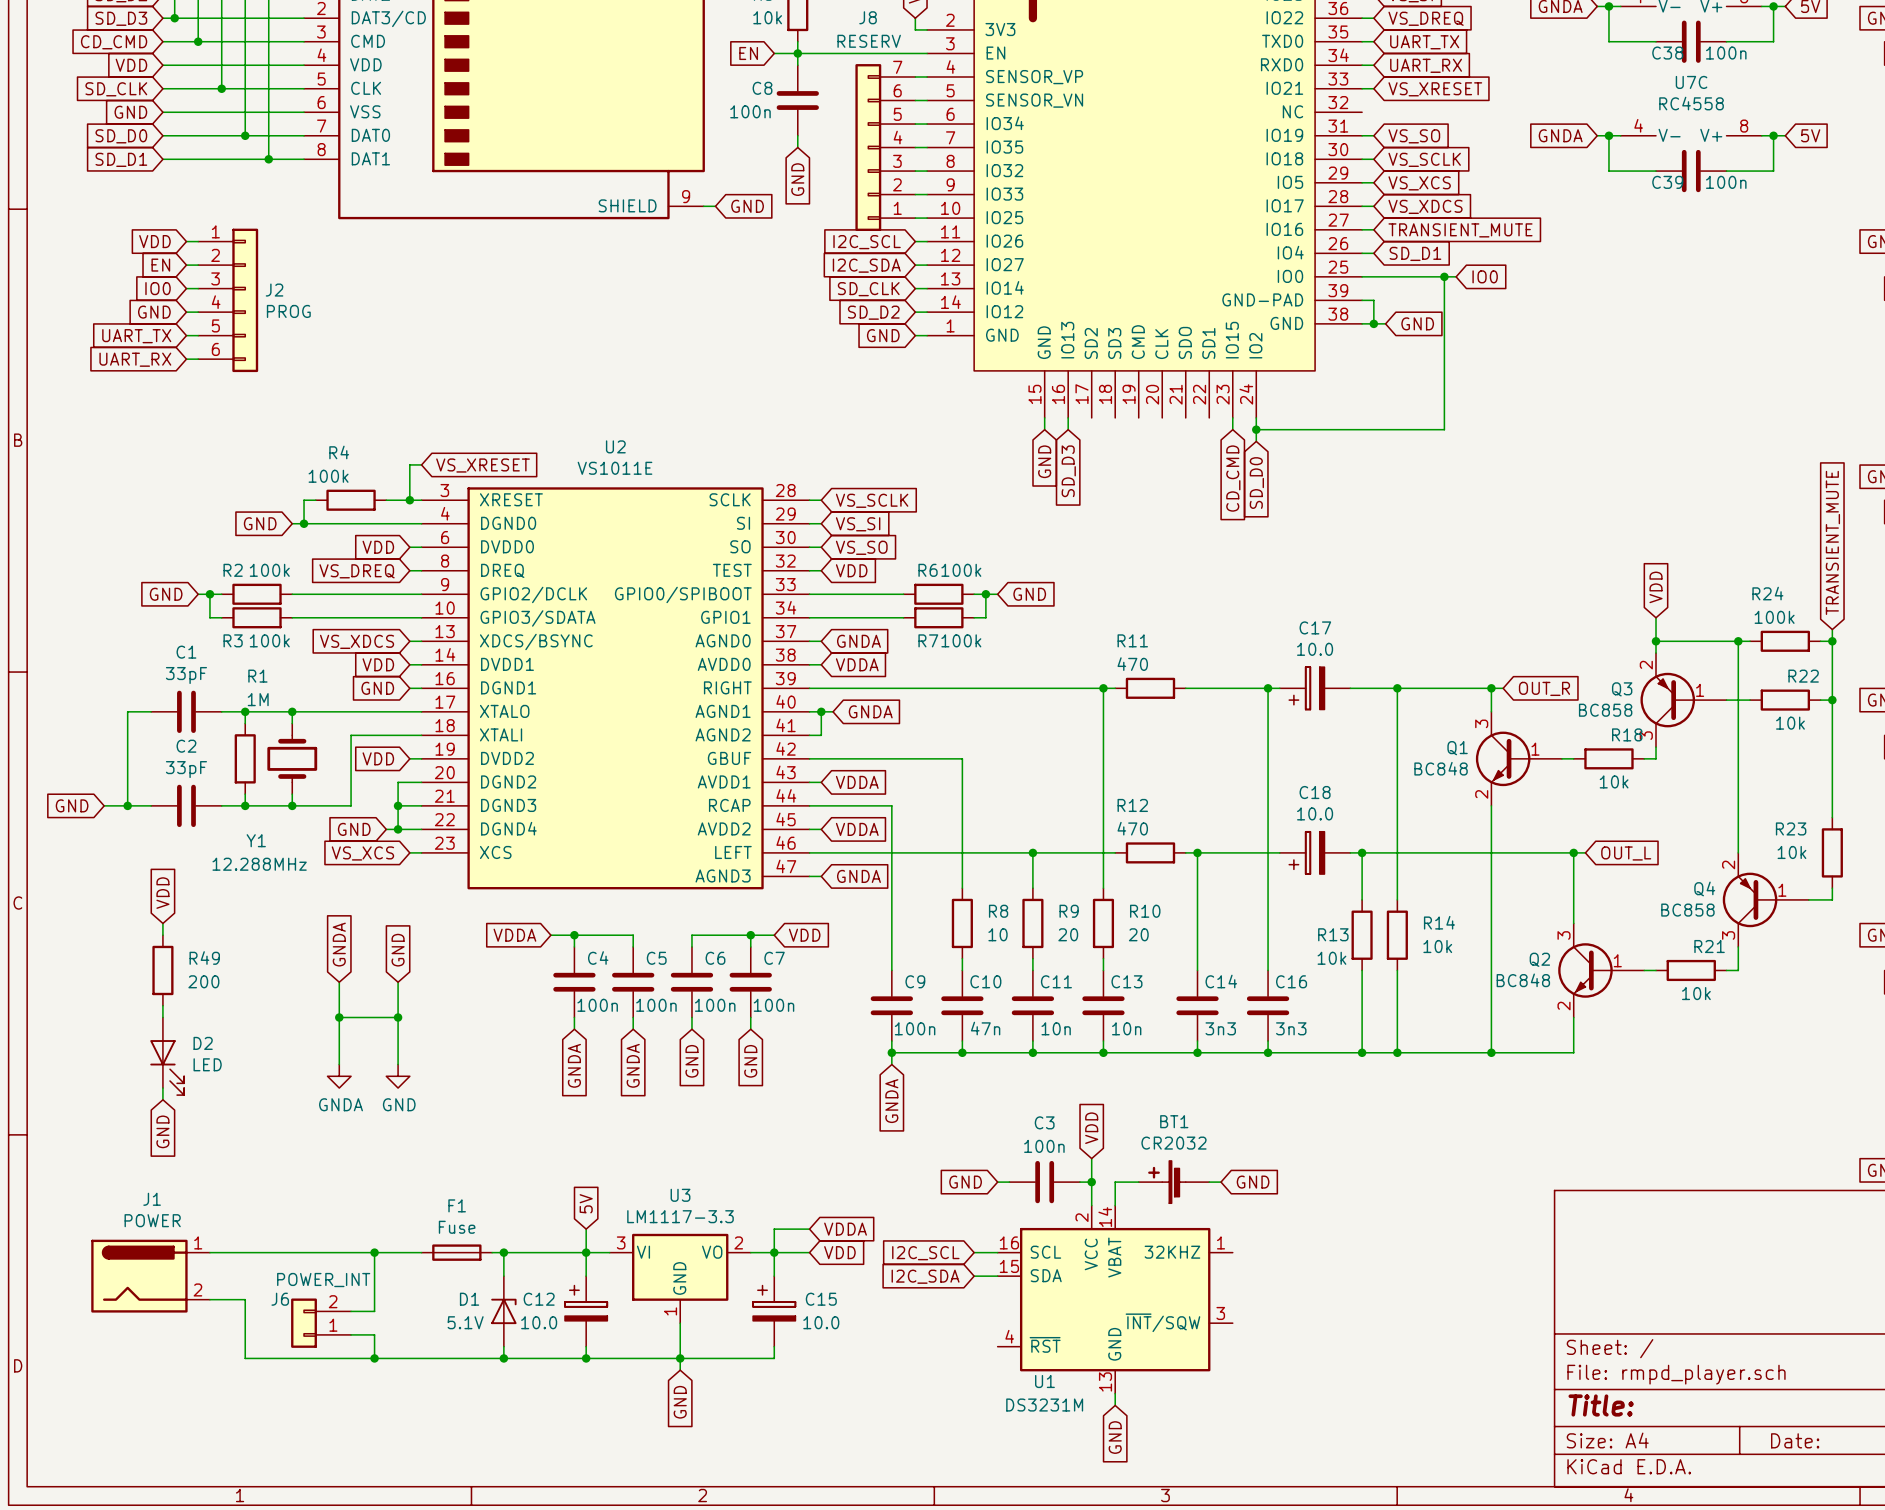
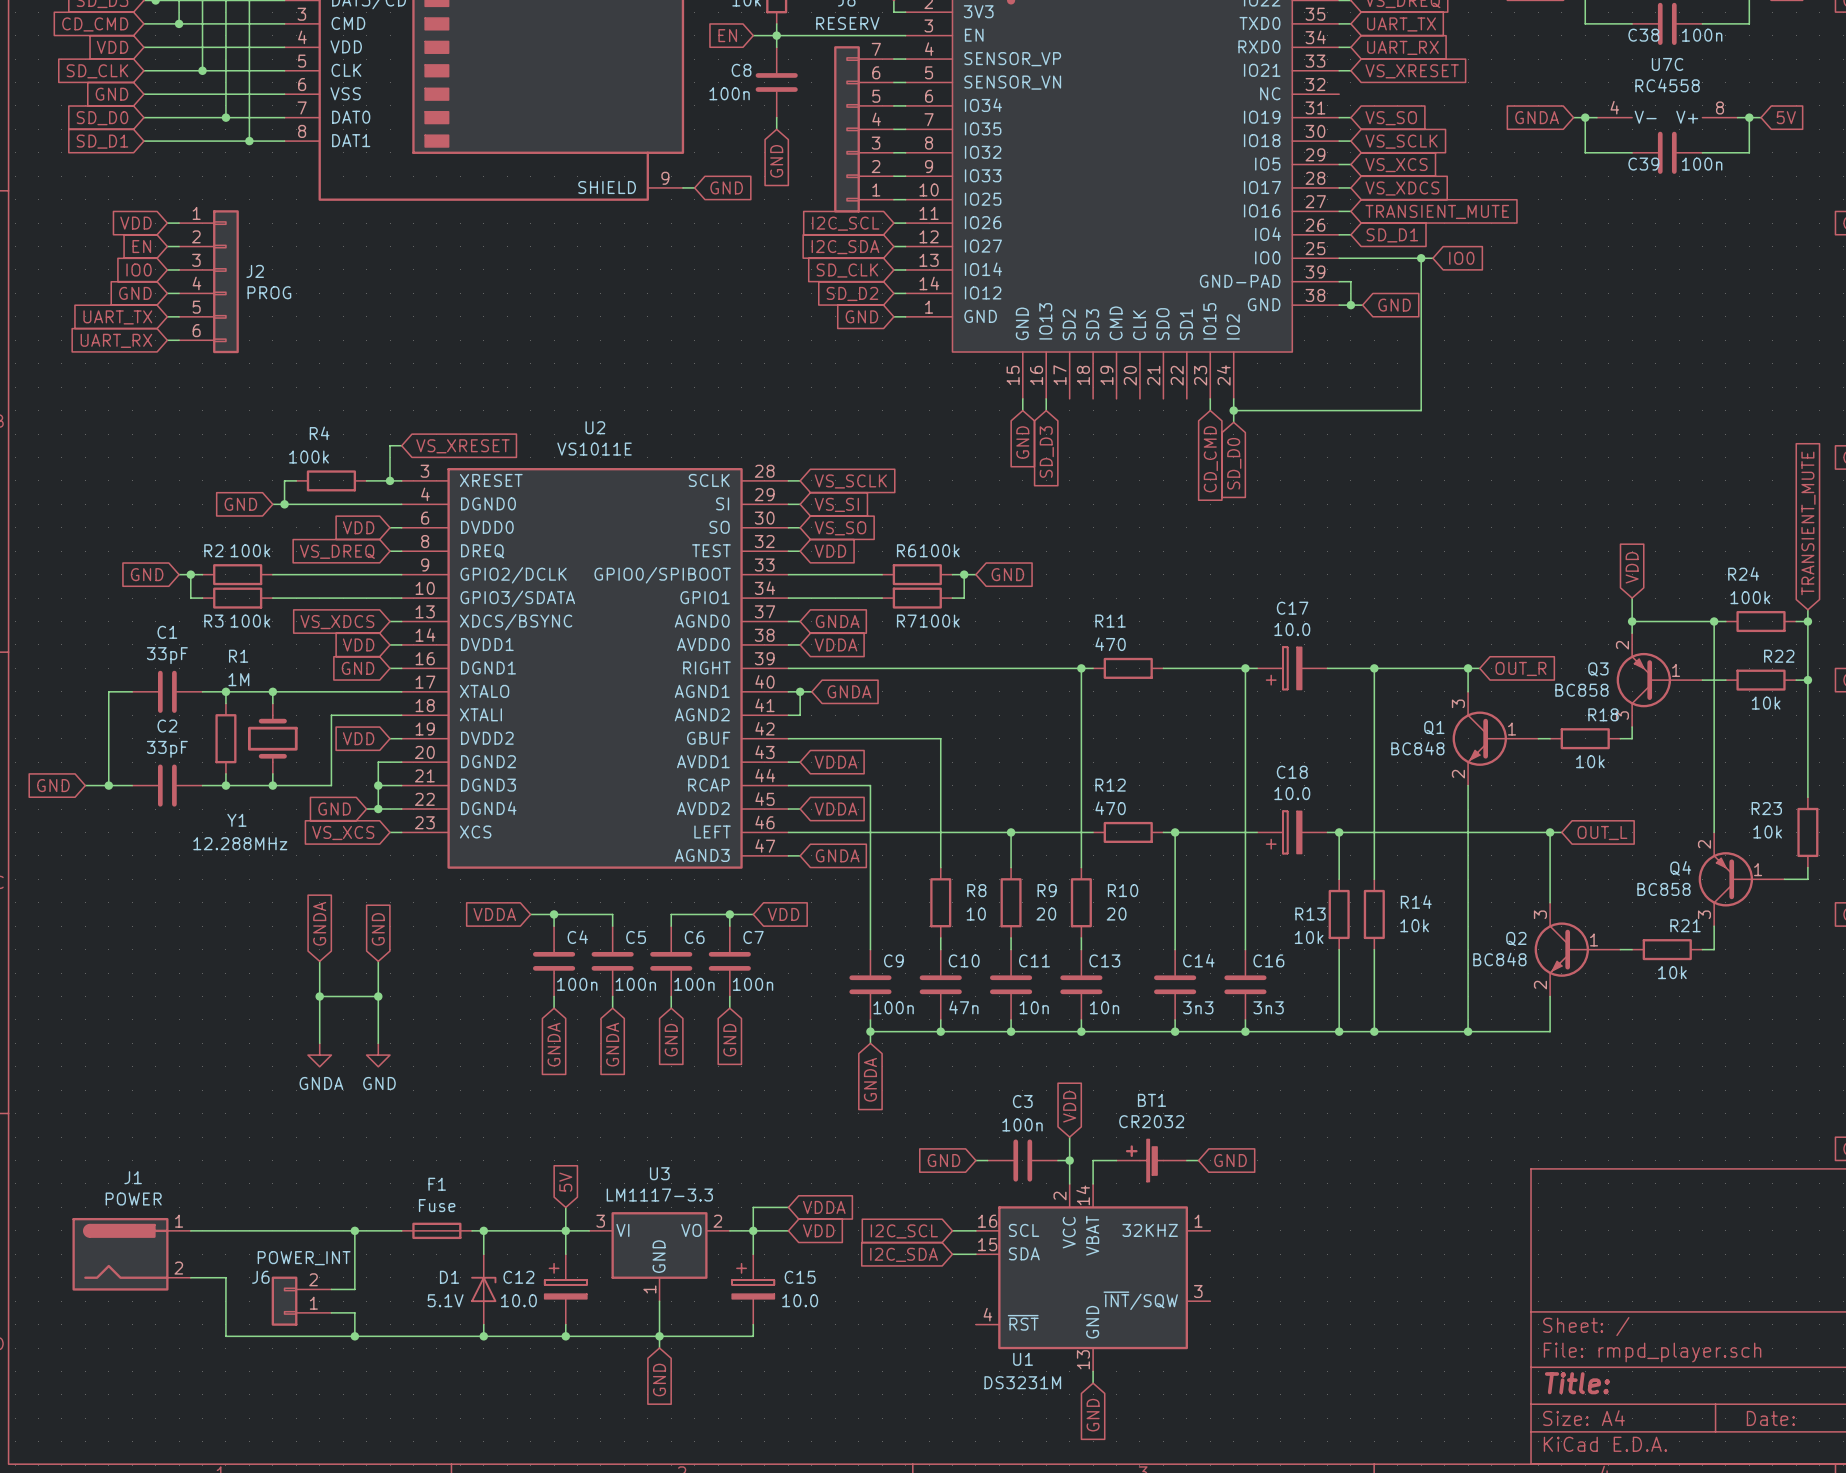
global label: VDD (162, 893) -> none
wire: (162, 923) (162, 935) -> none
R49: 200 (162, 970) -> none
wire: (162, 1005) (162, 1017) -> none
D2: LED (167, 1056) -> none
wire: (162, 1088) (162, 1099) -> none
global label: GND (162, 1131) -> none

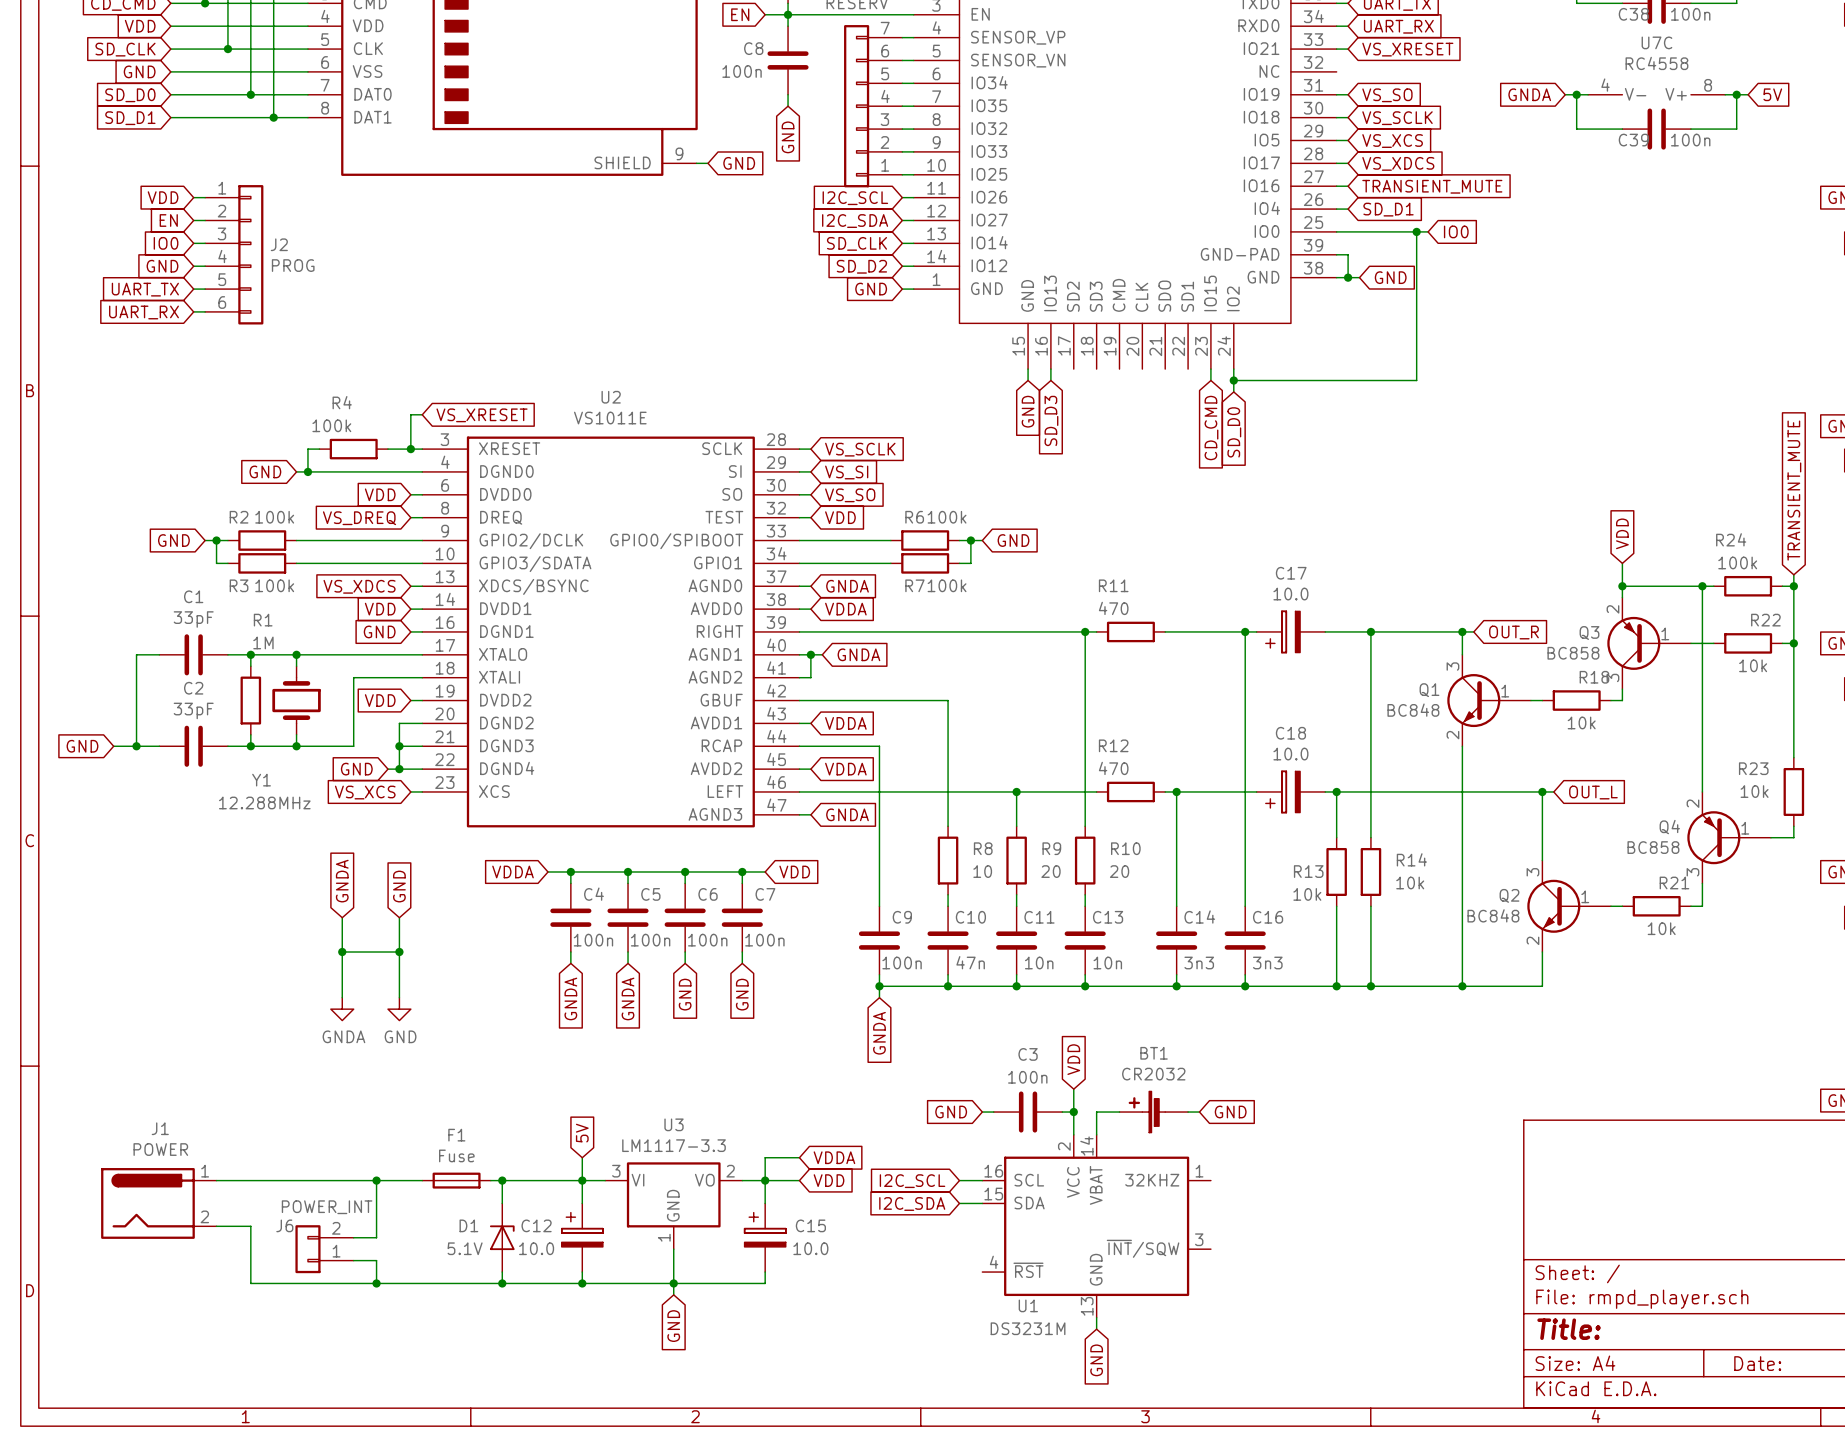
wire: none -> (628, 871) (685, 871)
junction: none -> (628, 871)
junction: none -> (685, 871)

